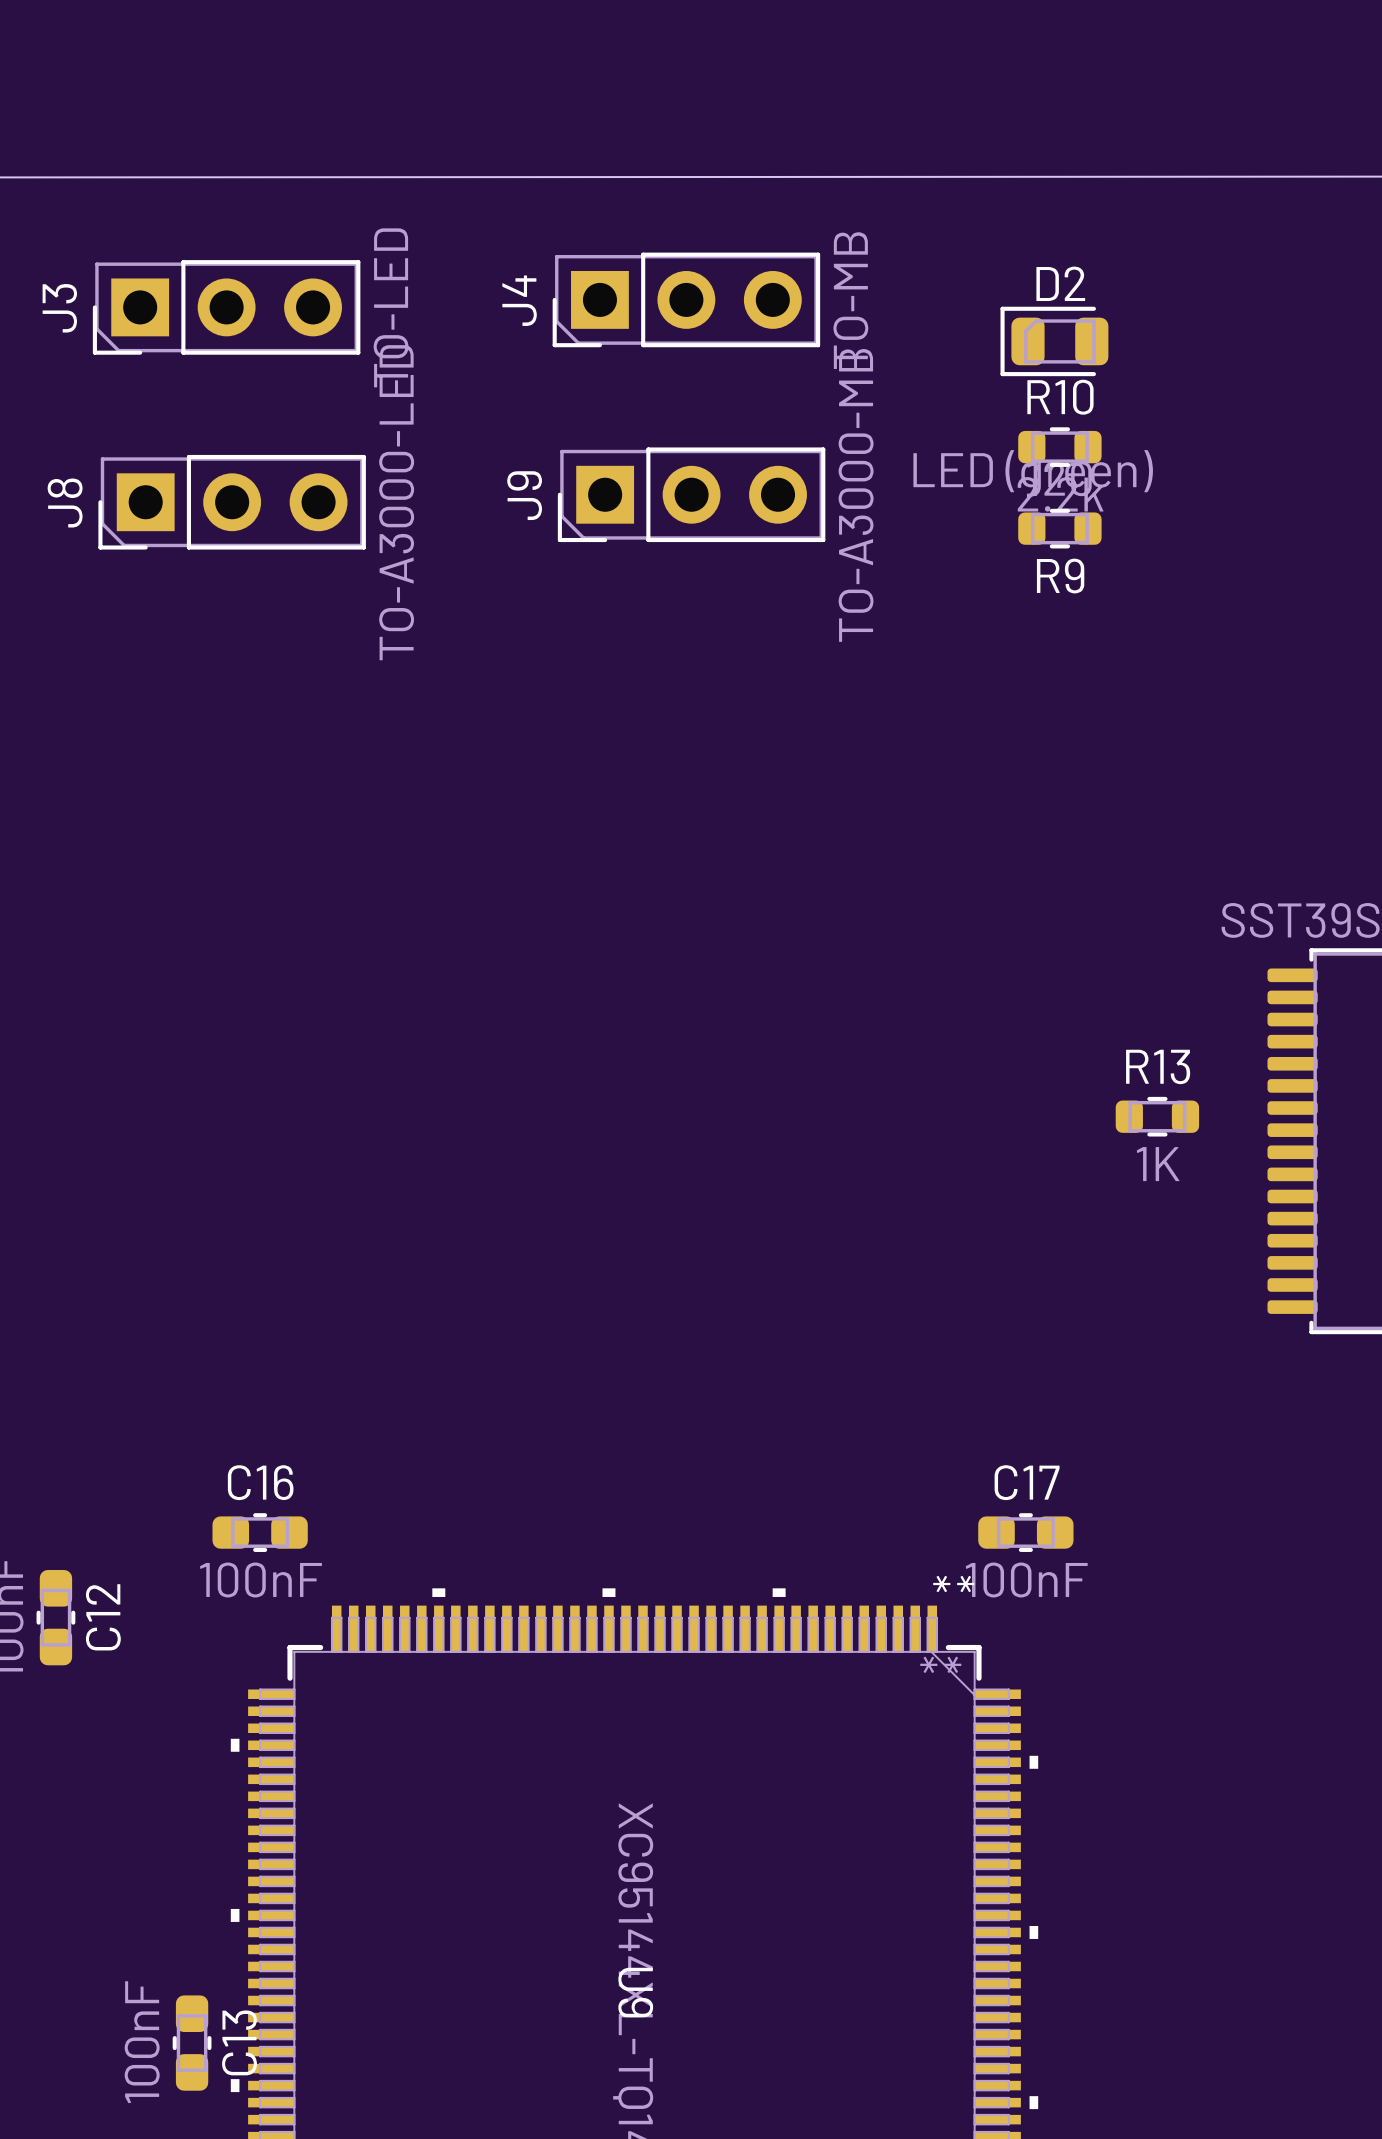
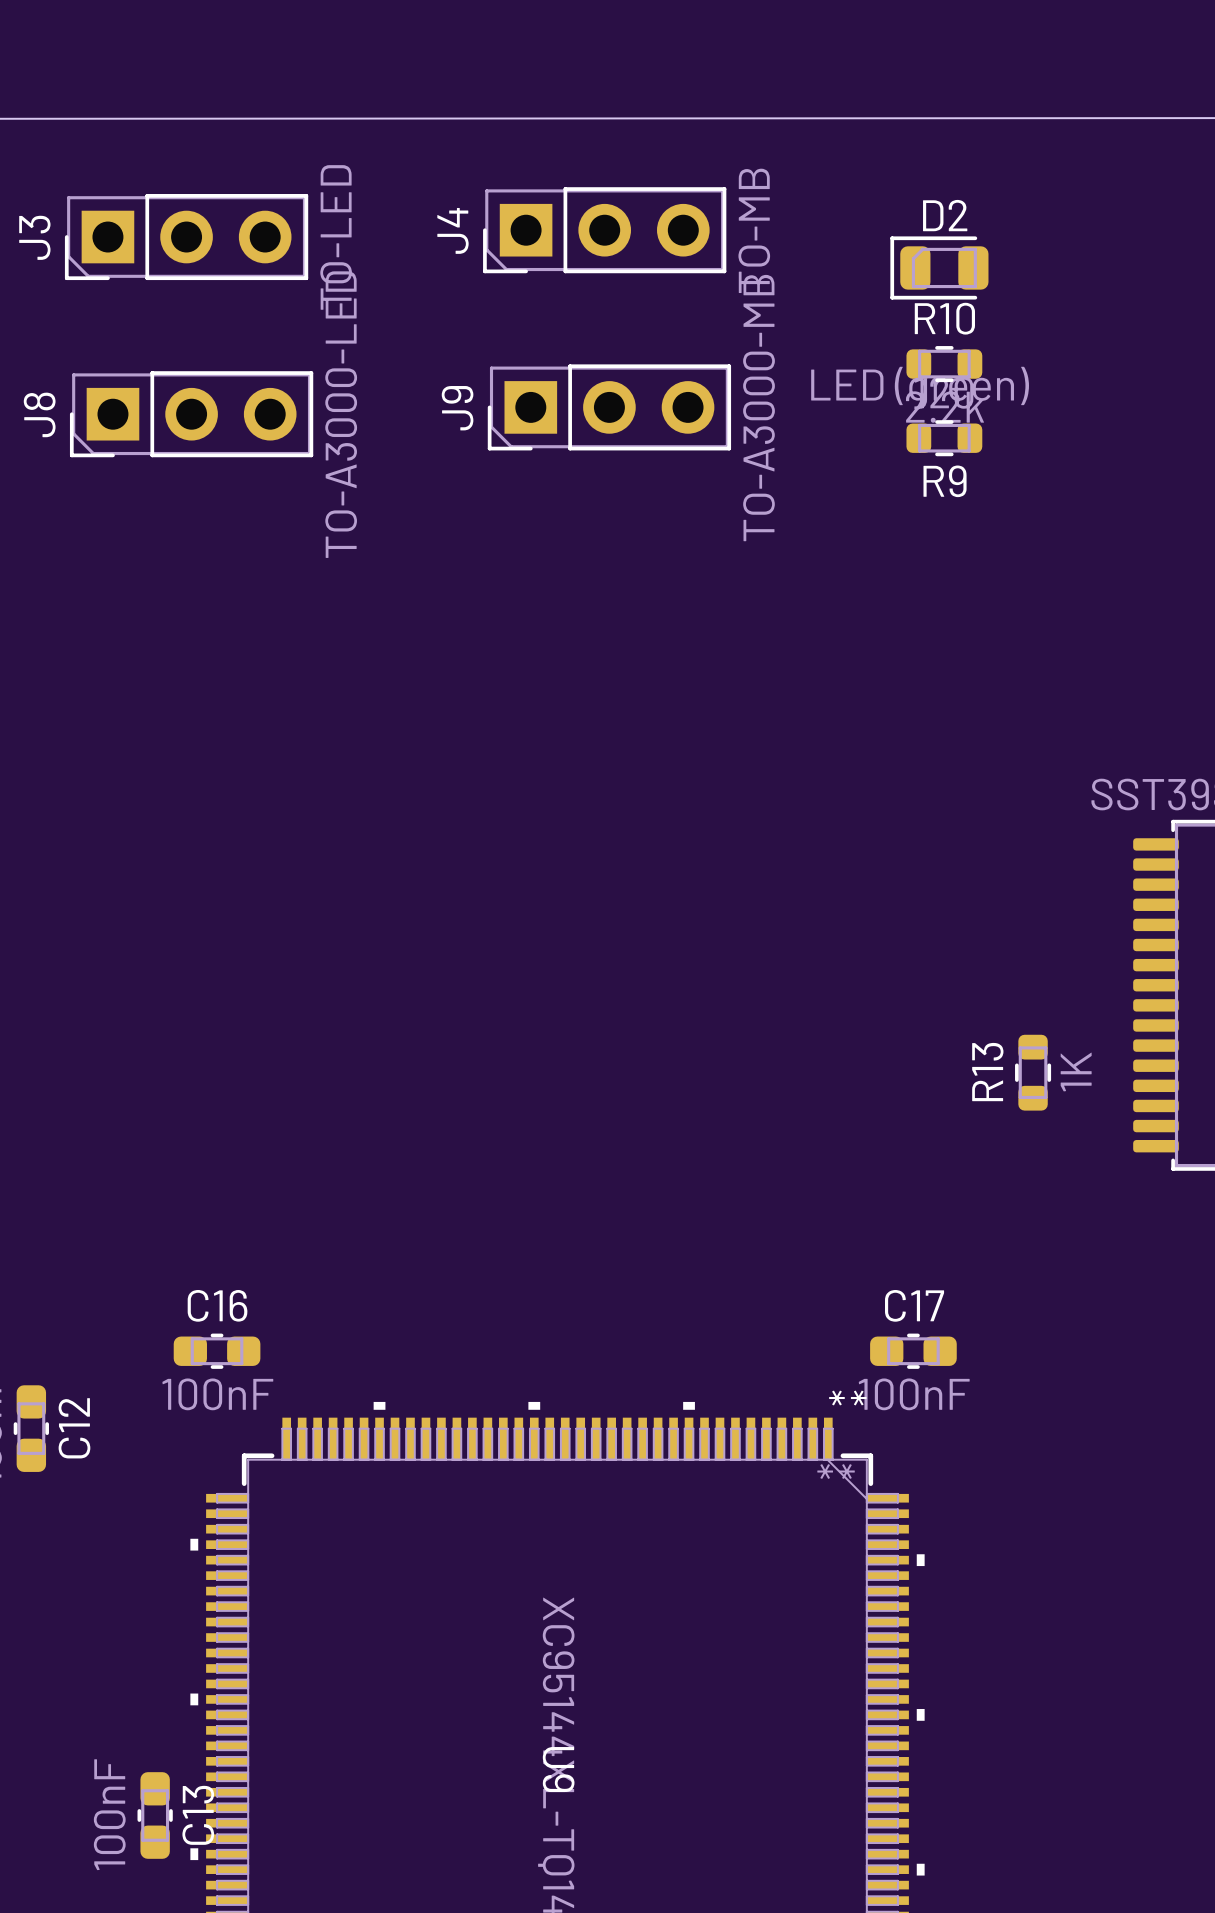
R13 name position: R13 (1158, 1066) -> R13 (987, 1072)
R13 rotation: 0° (1157, 1116) -> 90° clockwise (1033, 1072)
R13 position: (1157, 1116) -> (1033, 1072)
R13 value position: 1K (1158, 1164) -> 1K (1076, 1072)

